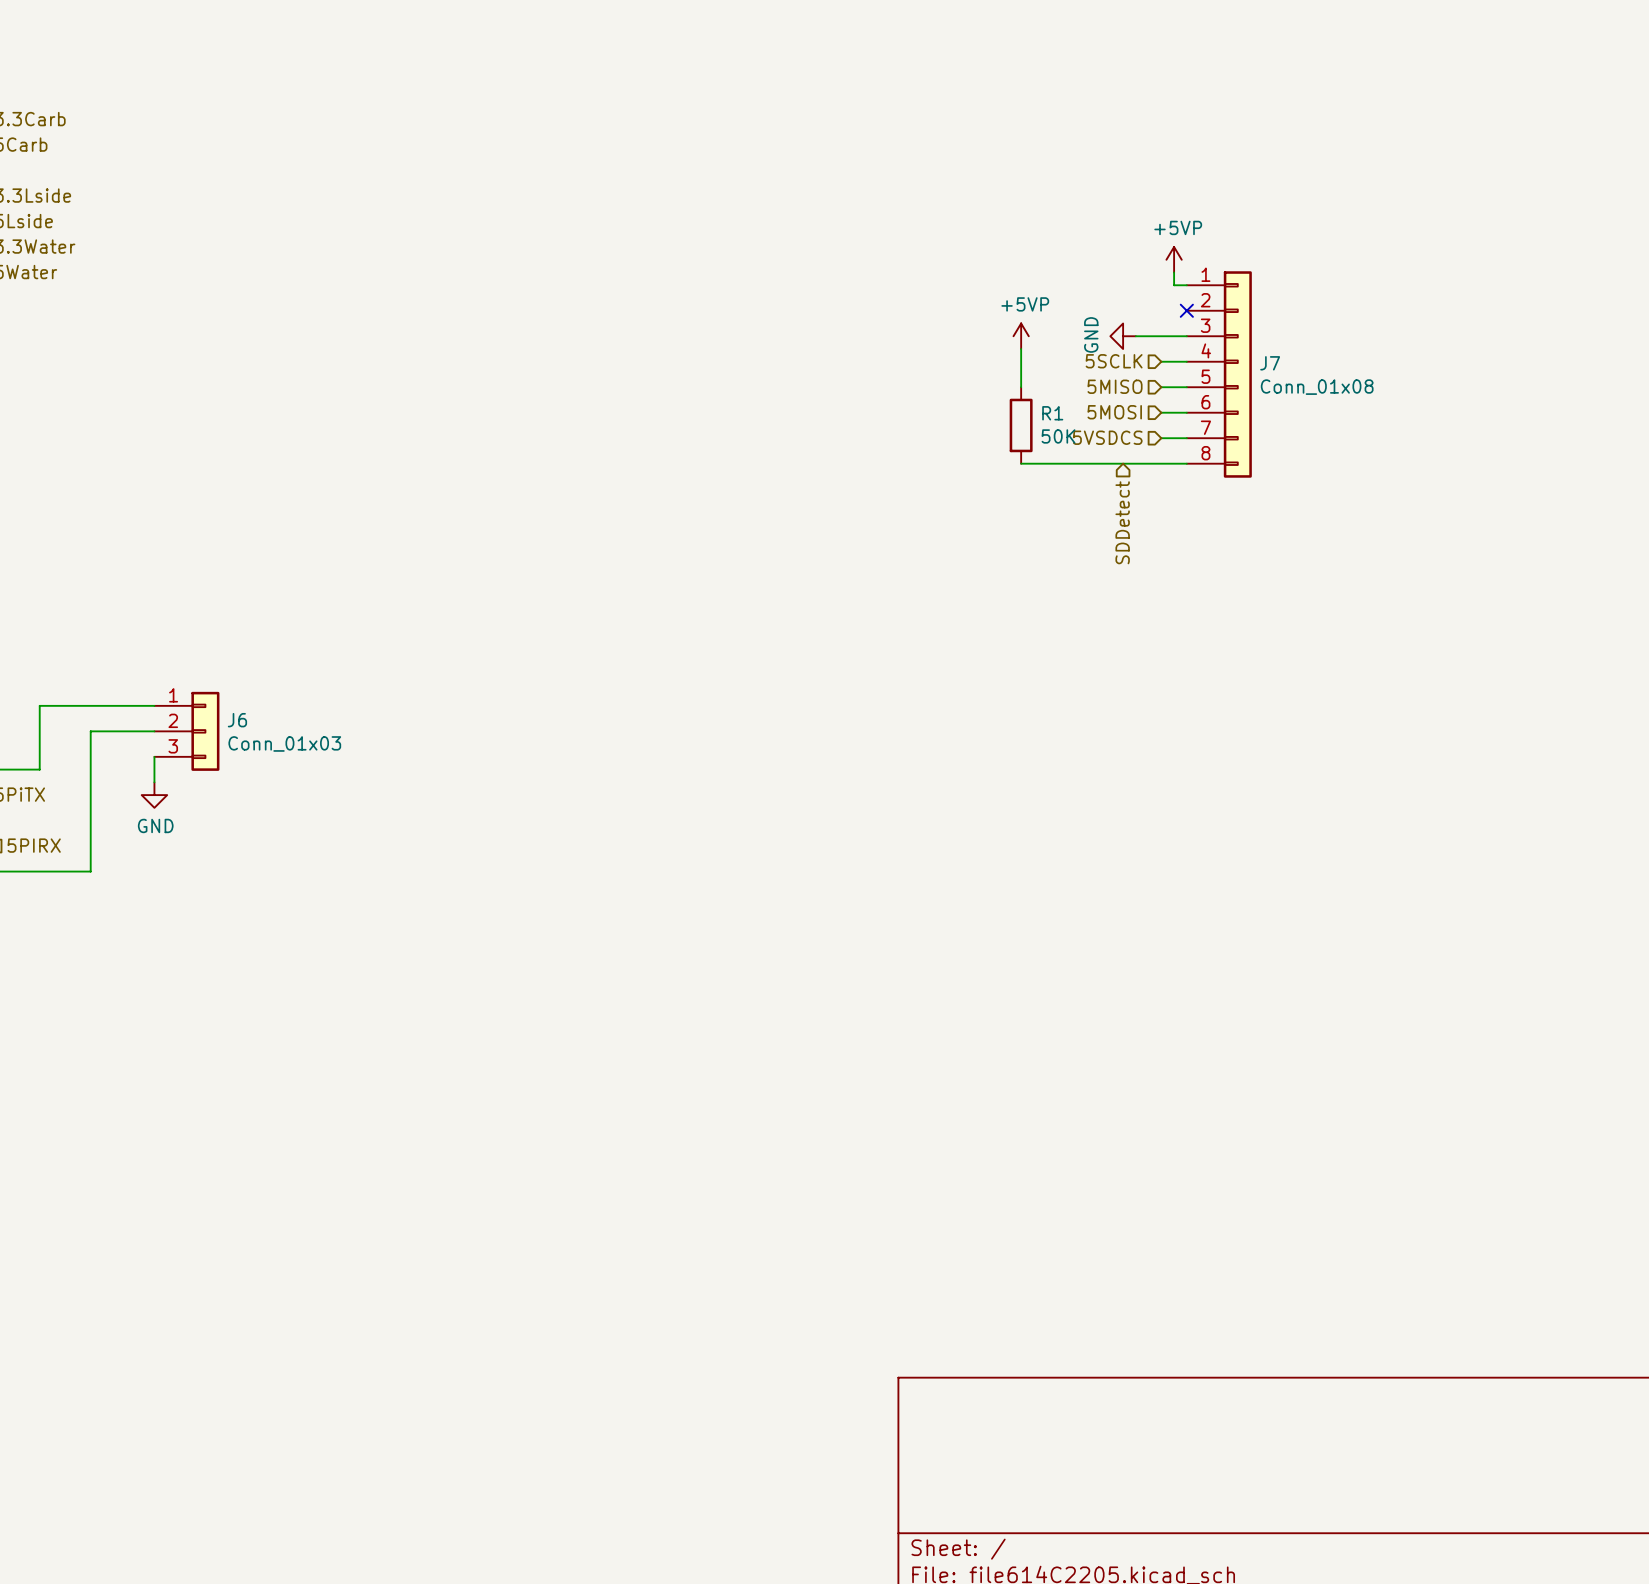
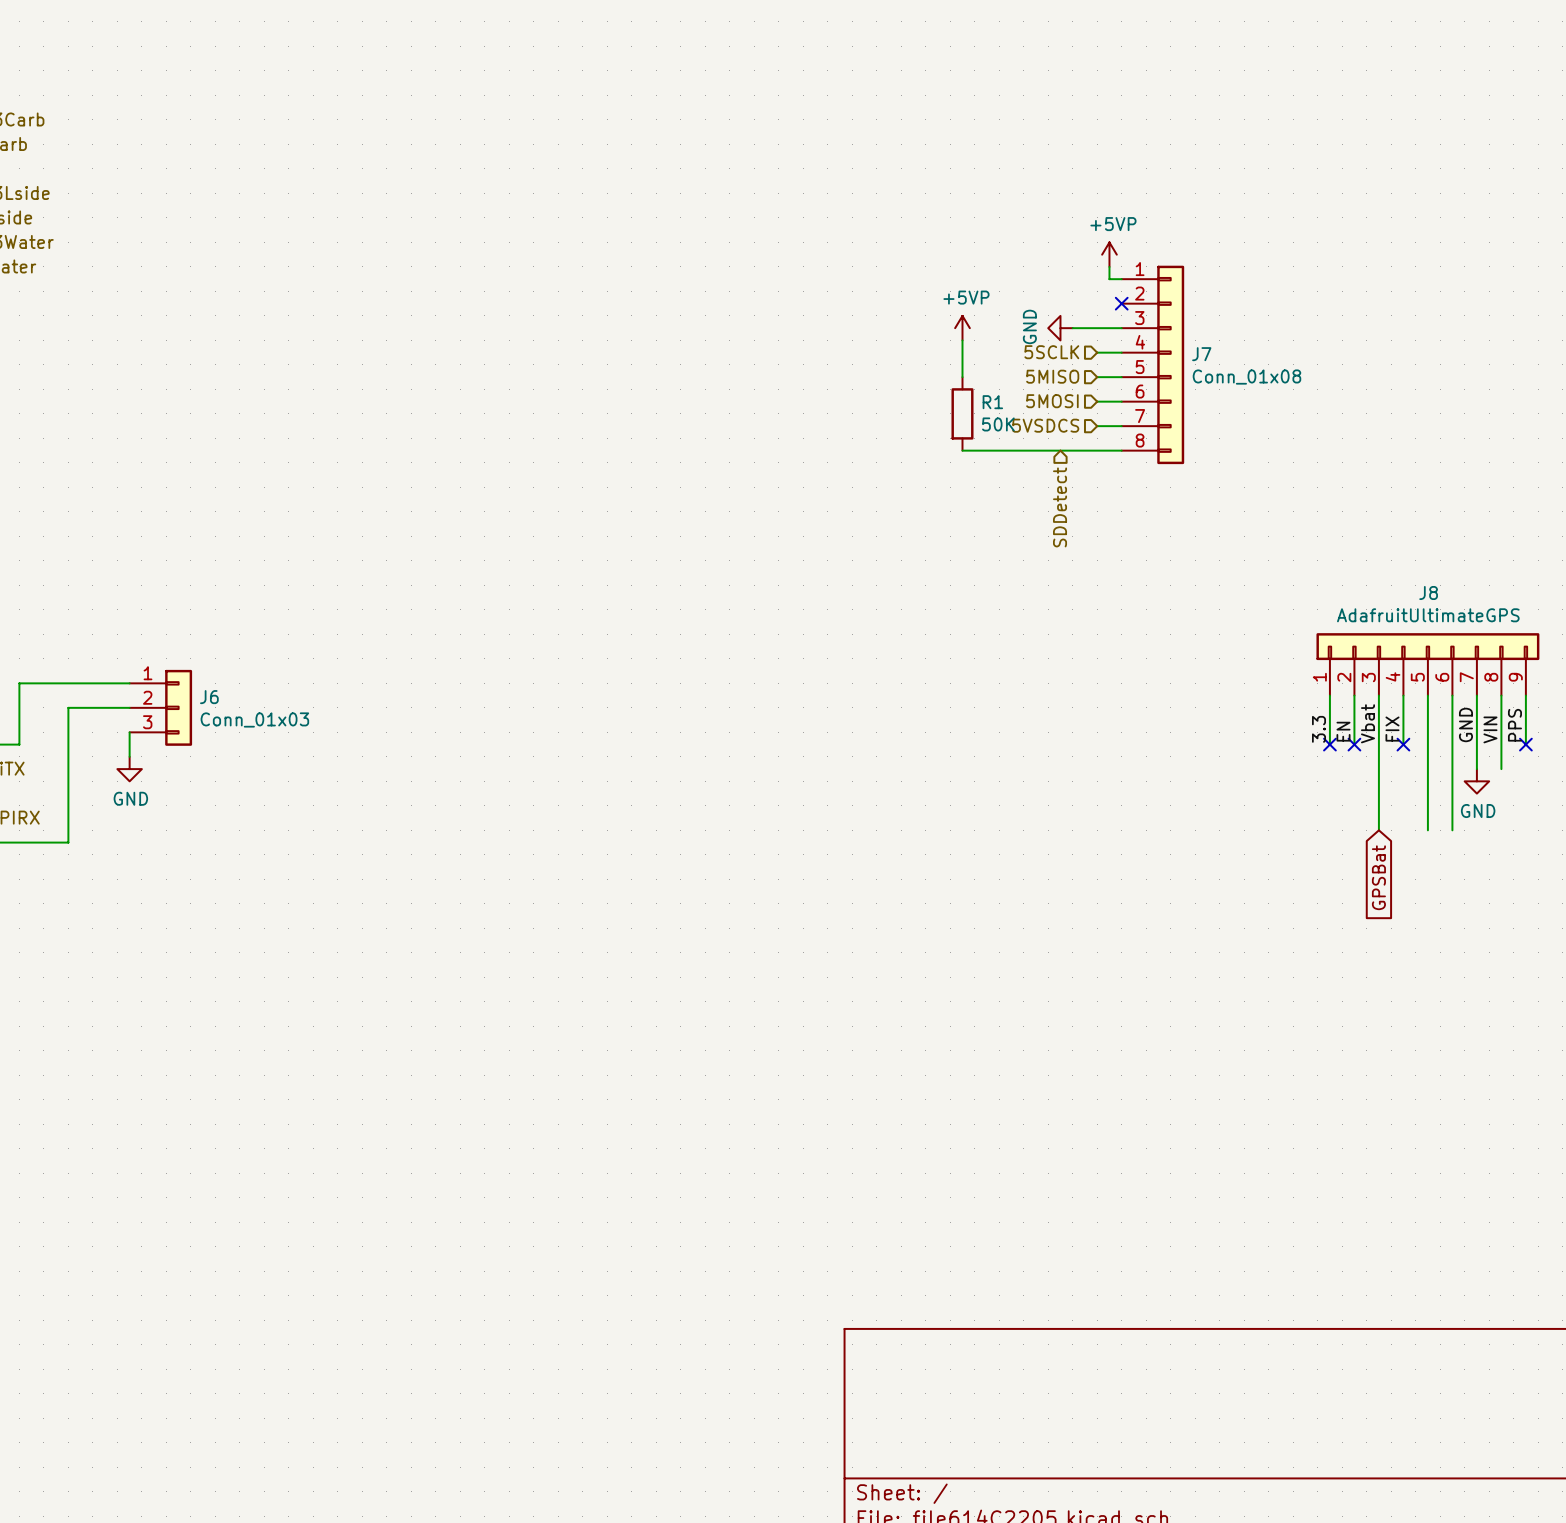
J8: none -> AdafruitUltimateGPS (1427, 664)
wire: none -> (1329, 695) (1329, 744)
wire: none -> (1354, 695) (1354, 744)
wire: none -> (1378, 695) (1378, 830)
wire: none -> (1403, 695) (1403, 744)
wire: none -> (1427, 695) (1427, 830)
wire: none -> (1452, 695) (1452, 830)
wire: none -> (1476, 695) (1476, 769)
wire: none -> (1501, 695) (1501, 769)
wire: none -> (1525, 695) (1525, 744)
label: none -> Vbat (1368, 723)
label: none -> GND (1465, 724)
label: none -> PPS (1514, 725)
label: none -> 3.3 (1319, 729)
label: none -> FIX (1392, 729)
label: none -> VIN (1490, 729)
label: none -> EN (1343, 731)
no-connect mark: none -> (1329, 744)
no-connect mark: none -> (1354, 744)
no-connect mark: none -> (1403, 744)
no-connect mark: none -> (1525, 744)
power symbol: none -> GND (1476, 781)
global label: none -> GPSBat (1378, 877)

